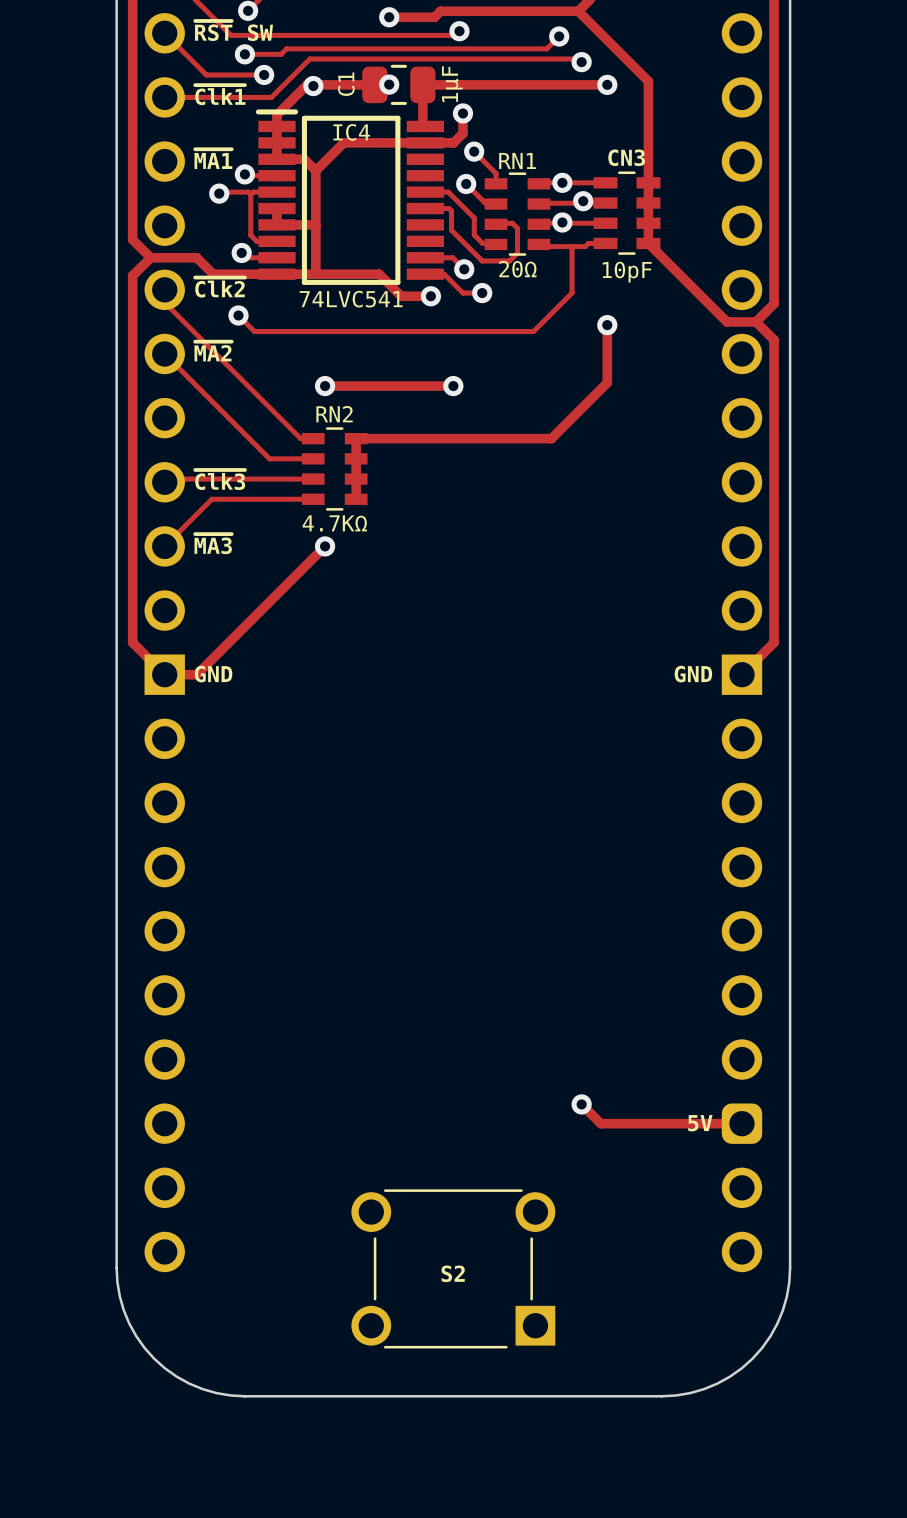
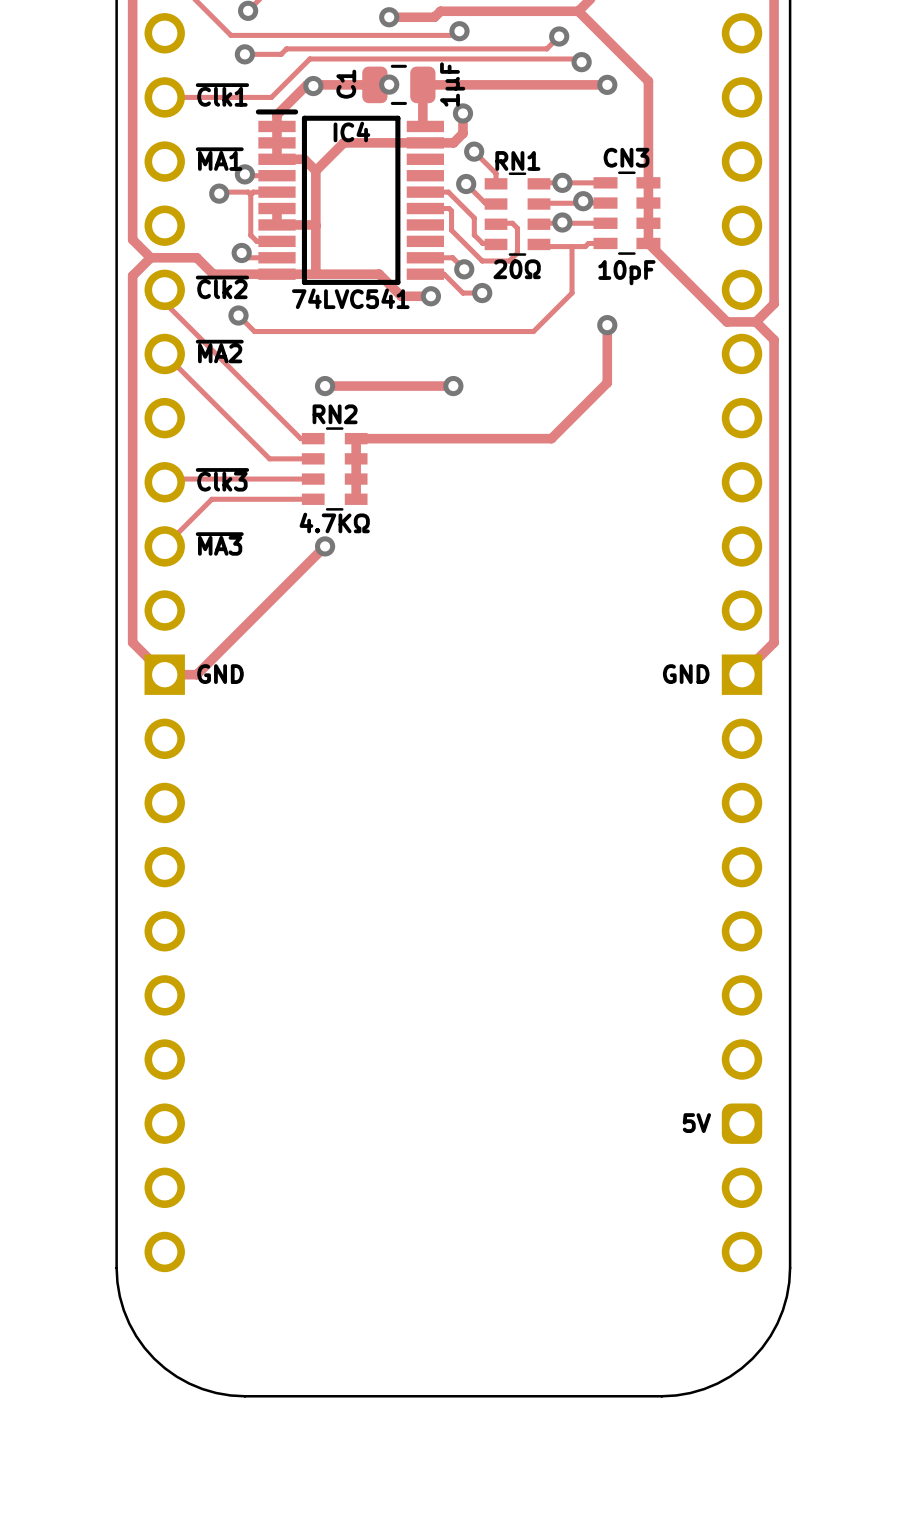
text: ~{RST} SW (234, 30) -> none
track: (164, 33) (206, 74) (264, 74) -> none
via: (264, 74) -> none
track: (581, 1104) (600, 1123) (741, 1123) -> none
via: (581, 1104) -> none
S2: (453, 1268) -> none

